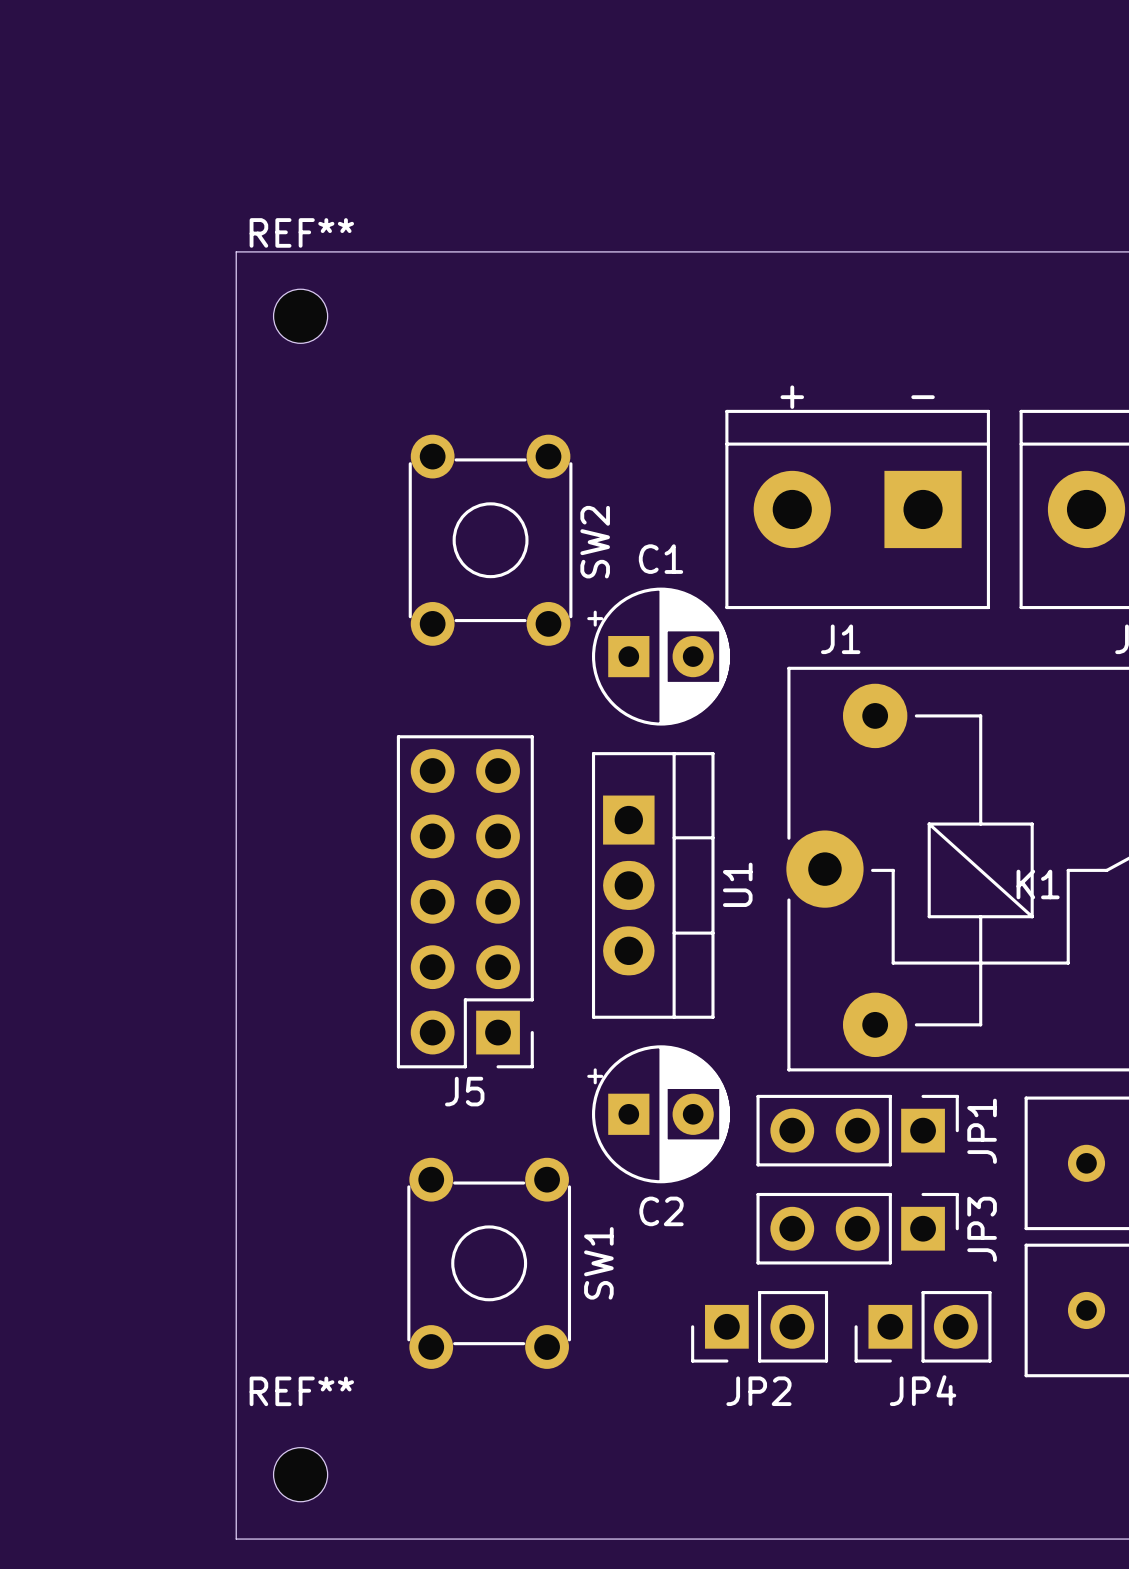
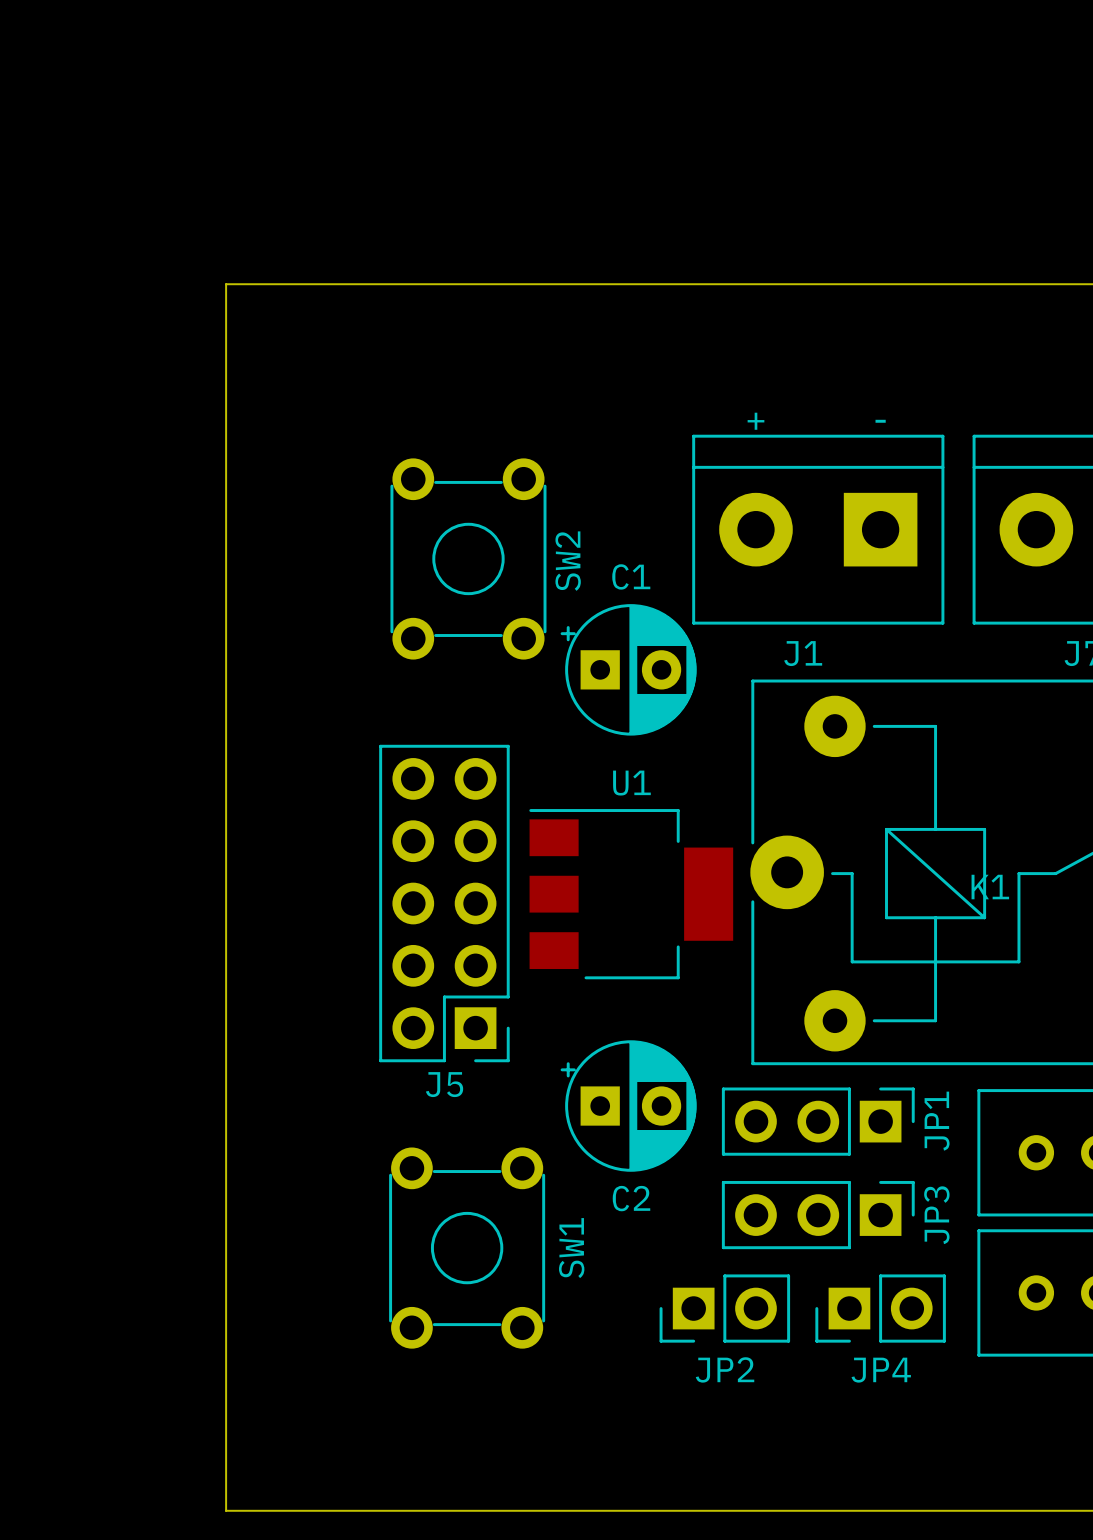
REF**: (300, 316) -> none
U1 footprint: [591, 752, 715, 1019] -> [529, 809, 734, 980]
U1 name position: U1 (737, 884) -> U1 (631, 783)
REF**: (300, 1474) -> none

